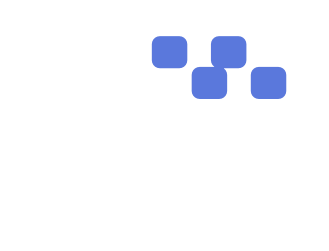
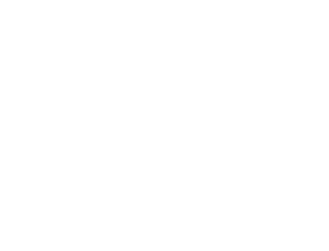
part: (199, 52) -> none
part: (238, 82) -> none

